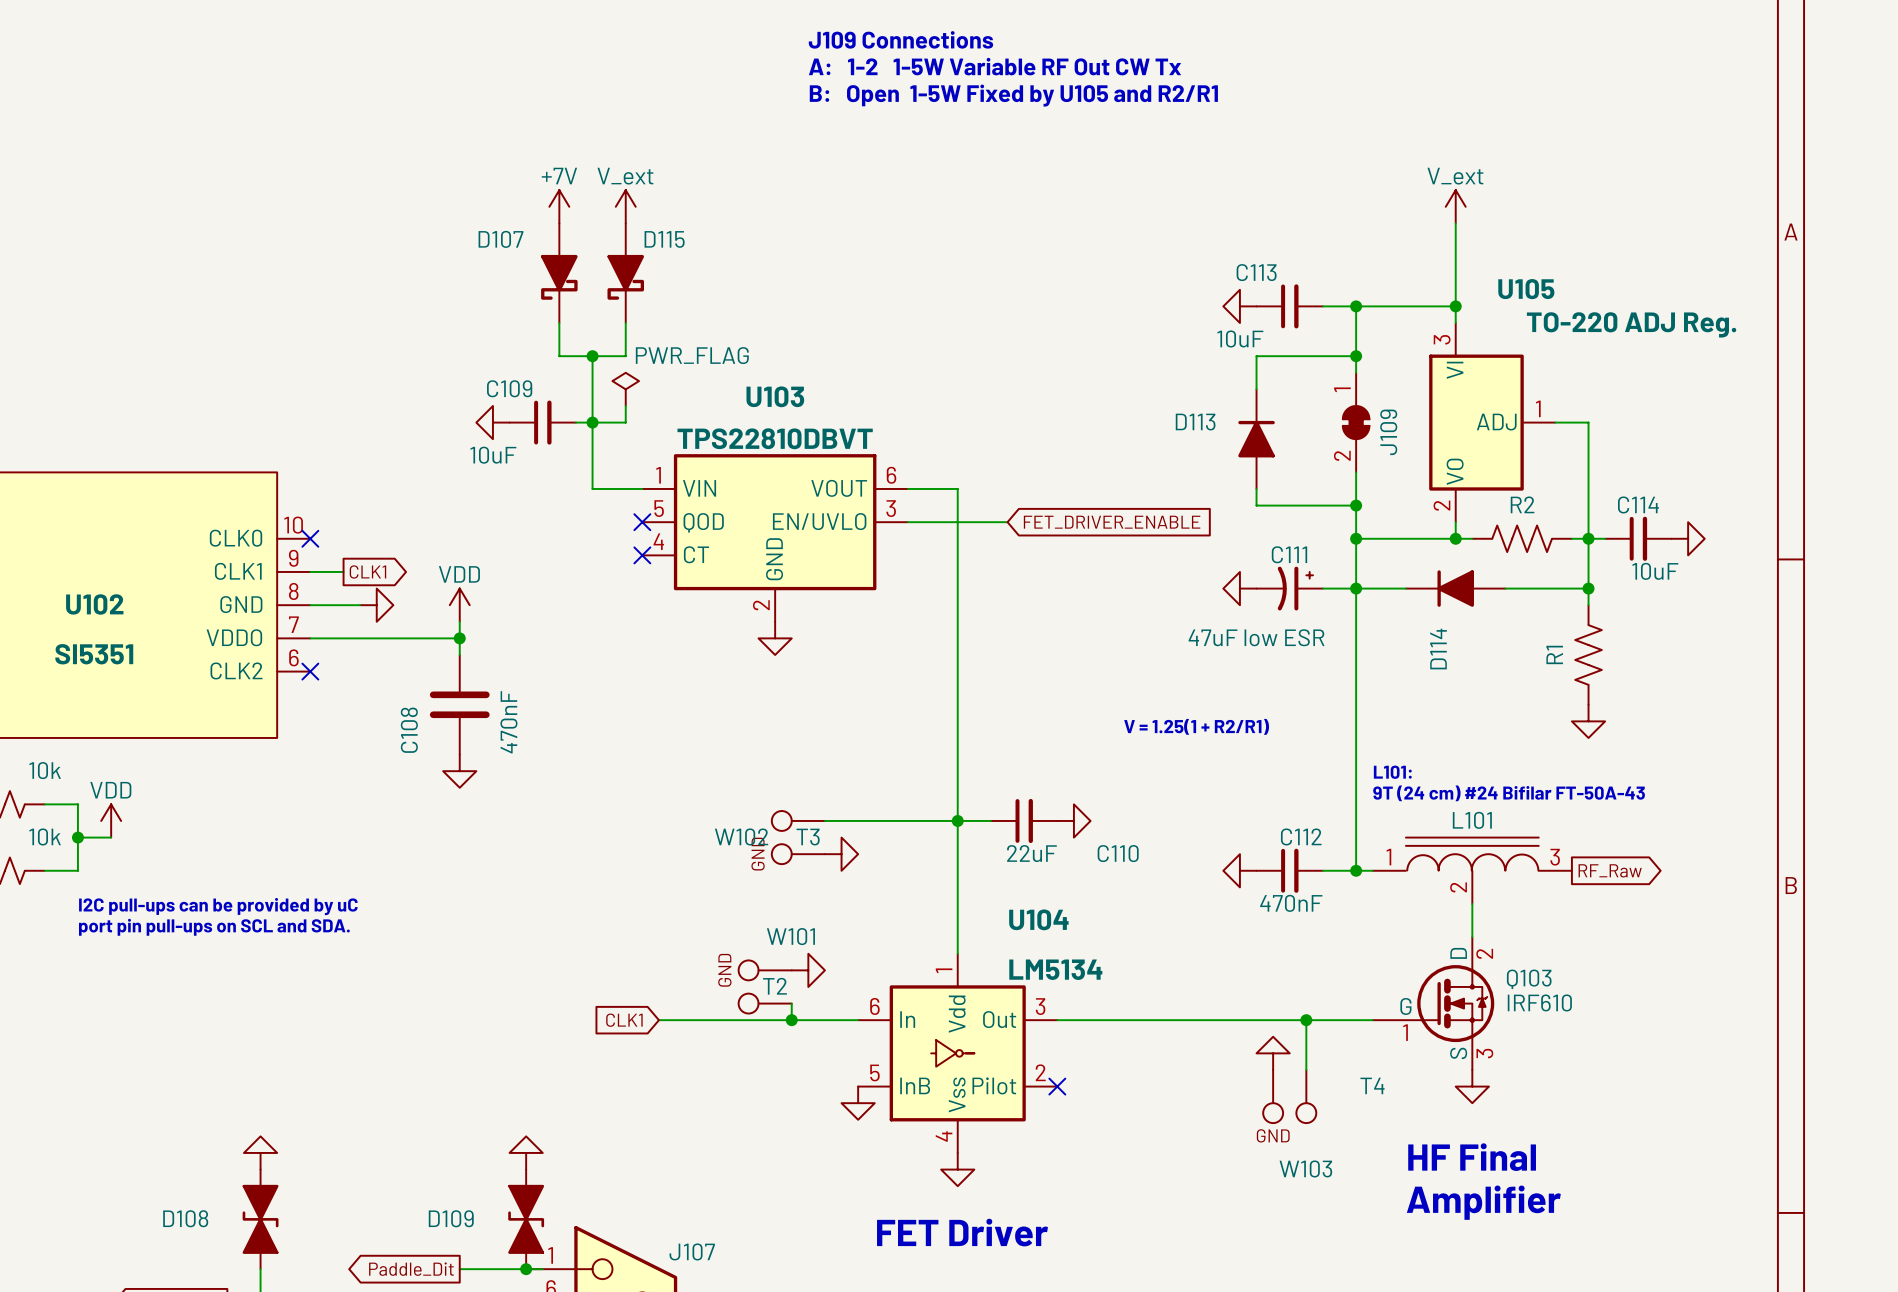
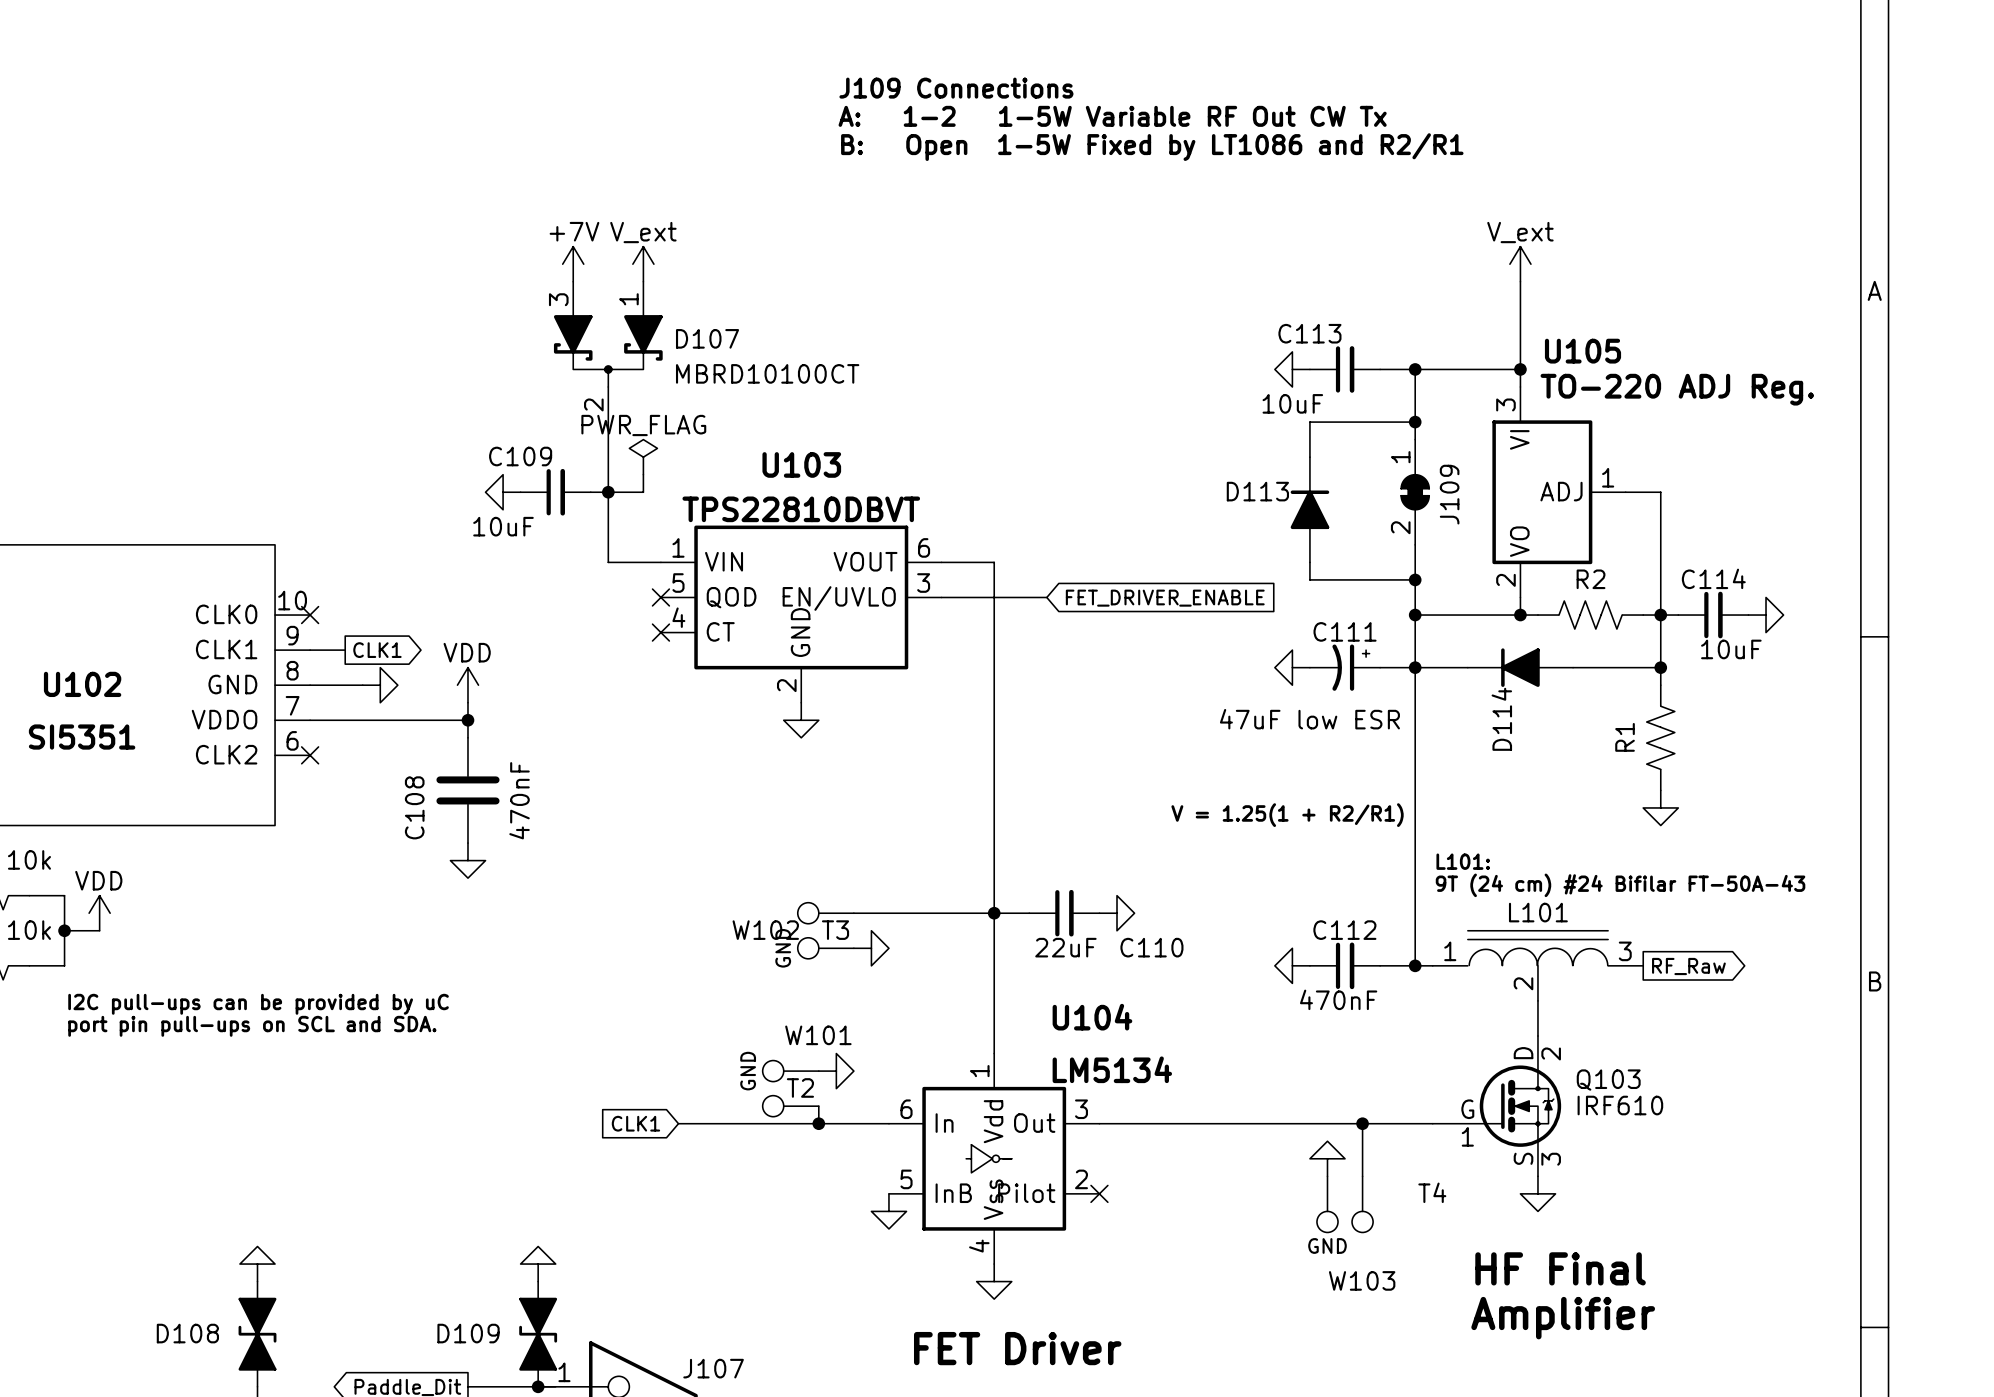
text: B: Open 1-5W Fixed by U105 and R2/R1 (1013, 95) -> B: Open 1-5W Fixed by LT1086 and R2/R1 (1152, 147)
D107 symbol: [541, 223, 578, 323] -> [553, 281, 663, 423]
D107 name position: D107 (500, 239) -> D107 (707, 338)
D115: (625, 273) -> none
D107 value: none -> MBRD10100CT (767, 373)
wire: (559, 322) (559, 356) (625, 356) (625, 322) -> none
power symbol text position: PWR_FLAG (692, 355) -> PWR_FLAG (643, 425)
junction: (592, 356) -> none

